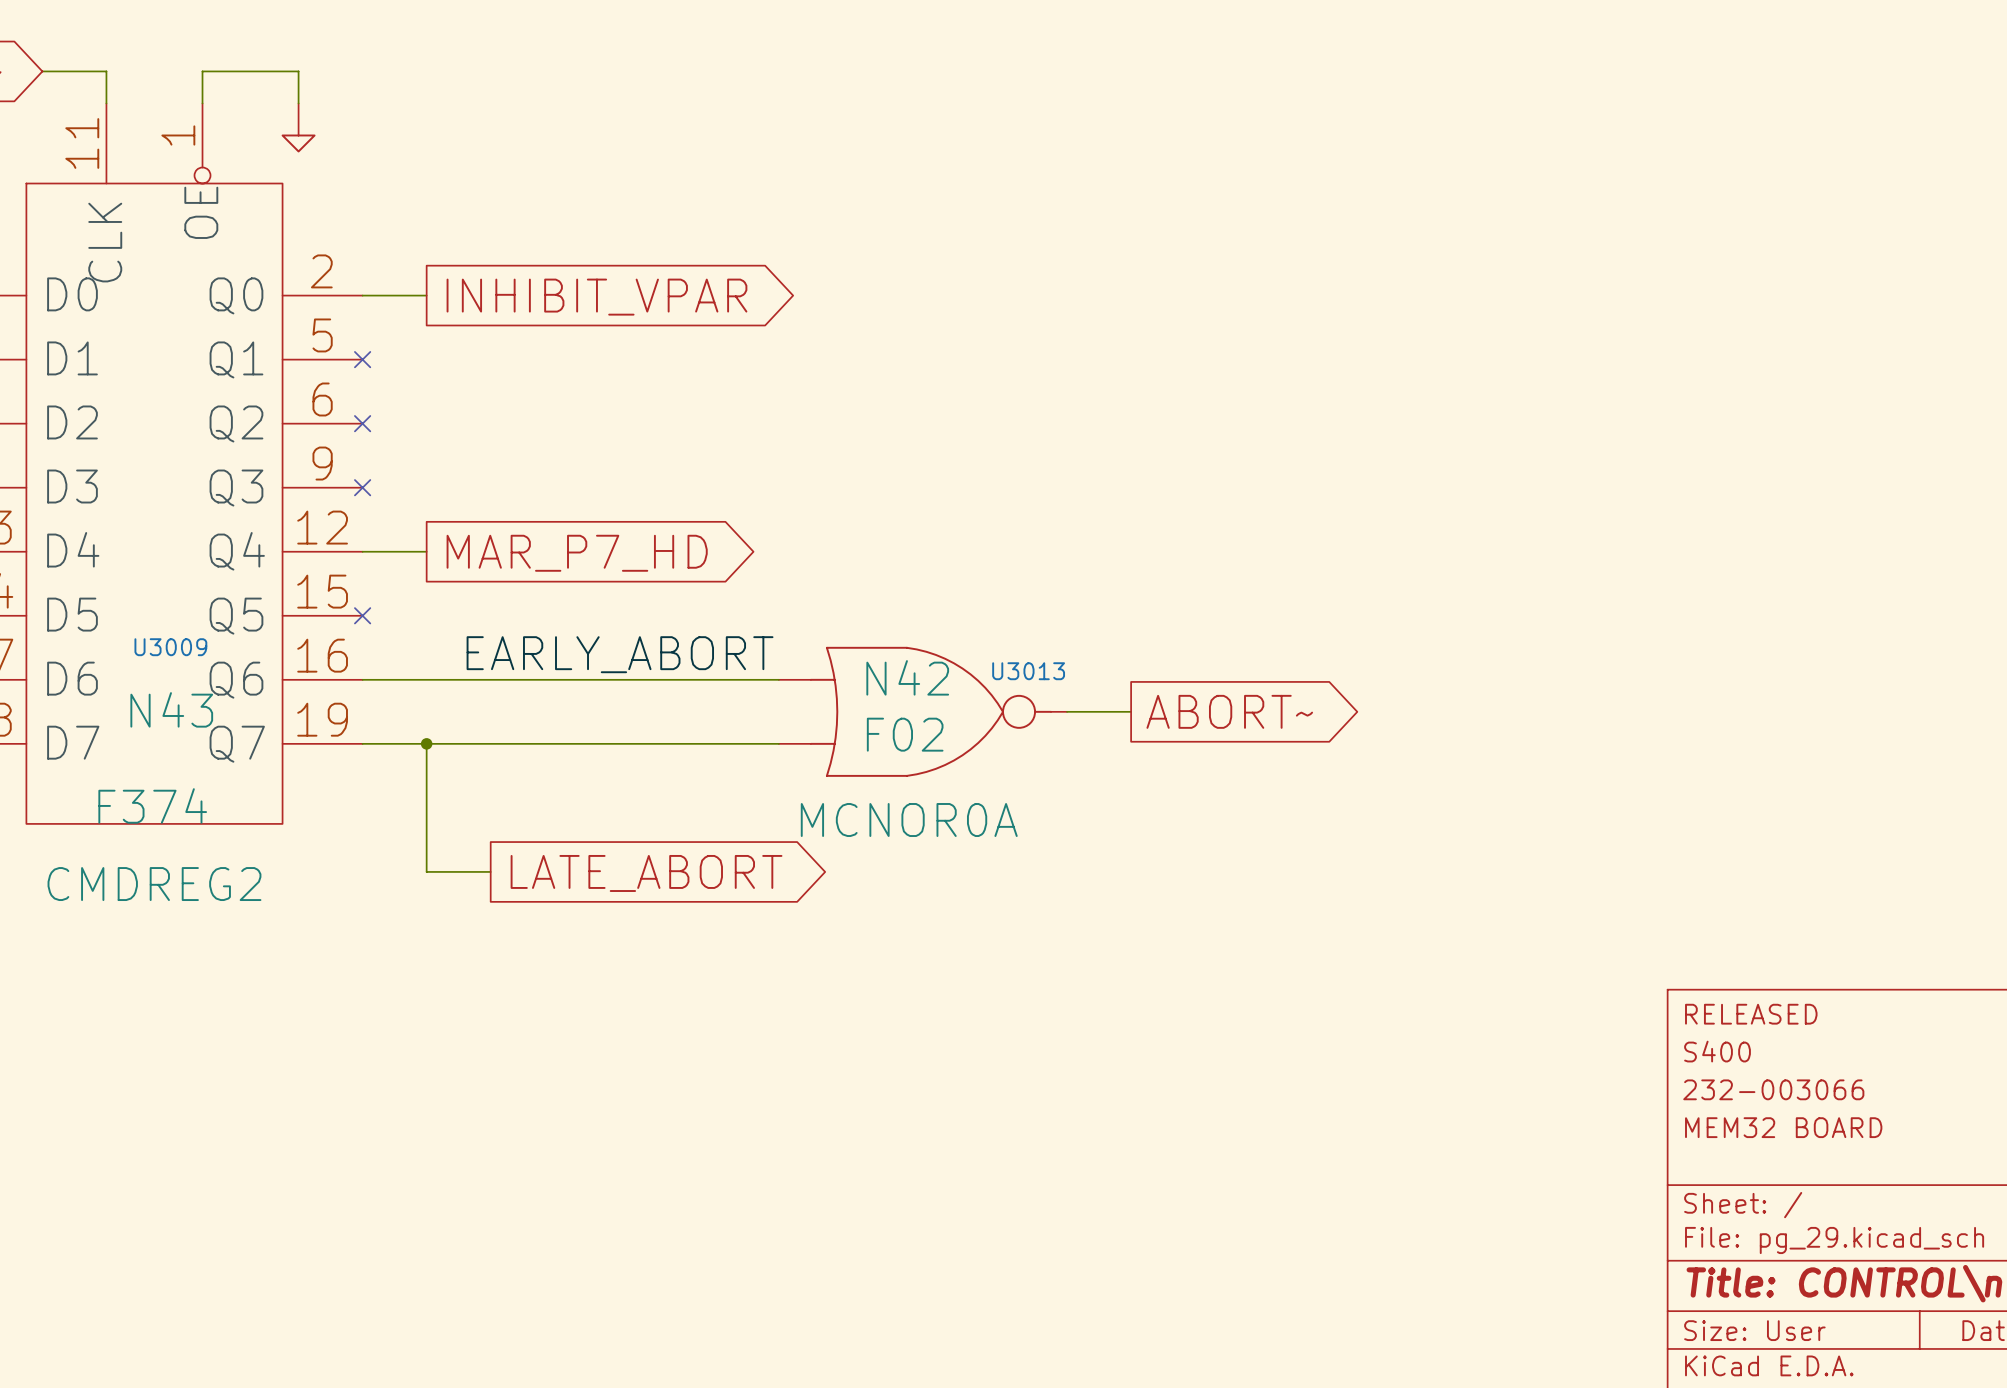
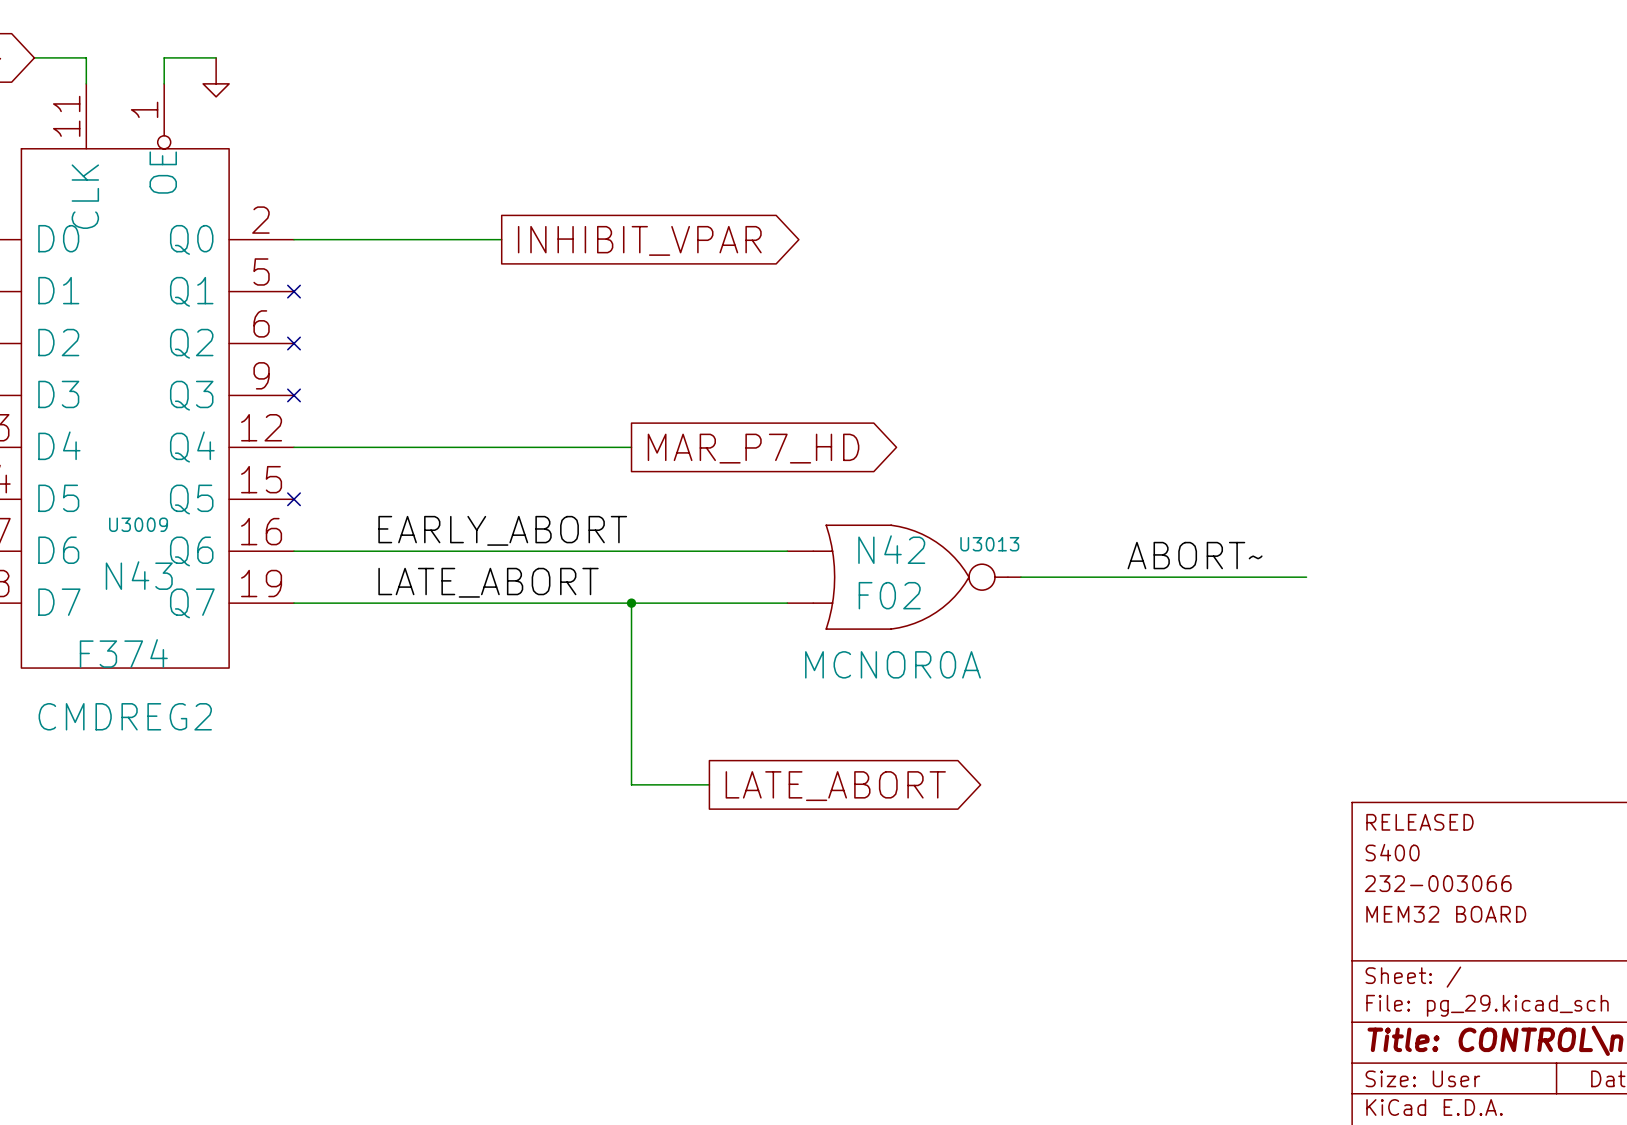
wire: (266, 71) (298, 71) (298, 103) -> none
power symbol position: (298, 127) -> (216, 77)
wire: none -> (345, 239) (501, 239)
global label position: INHIBIT_VPAR (596, 297) -> INHIBIT_VPAR (639, 240)
wire: none -> (345, 447) (631, 447)
global label: MAR_P7_HD (577, 553) -> none
global label: none -> MAR_P7_HD (753, 448)
wire: none -> (631, 551) (787, 551)
label: none -> ABORT~ (1195, 555)
U3013 position: (922, 711) -> (904, 577)
wire: (1067, 711) (1131, 711) -> none
global label: ABORT~ (1229, 711) -> none
wire: none -> (1020, 577) (1306, 577)
label: none -> LATE_ABORT (488, 582)
wire: (426, 743) (426, 871) (490, 871) -> none
junction: (426, 743) -> none
junction: none -> (631, 603)
wire: none -> (787, 603) (631, 603) (631, 784) (709, 784)
global label: LATE_ABORT (646, 873) -> none
global label: none -> LATE_ABORT (835, 786)

